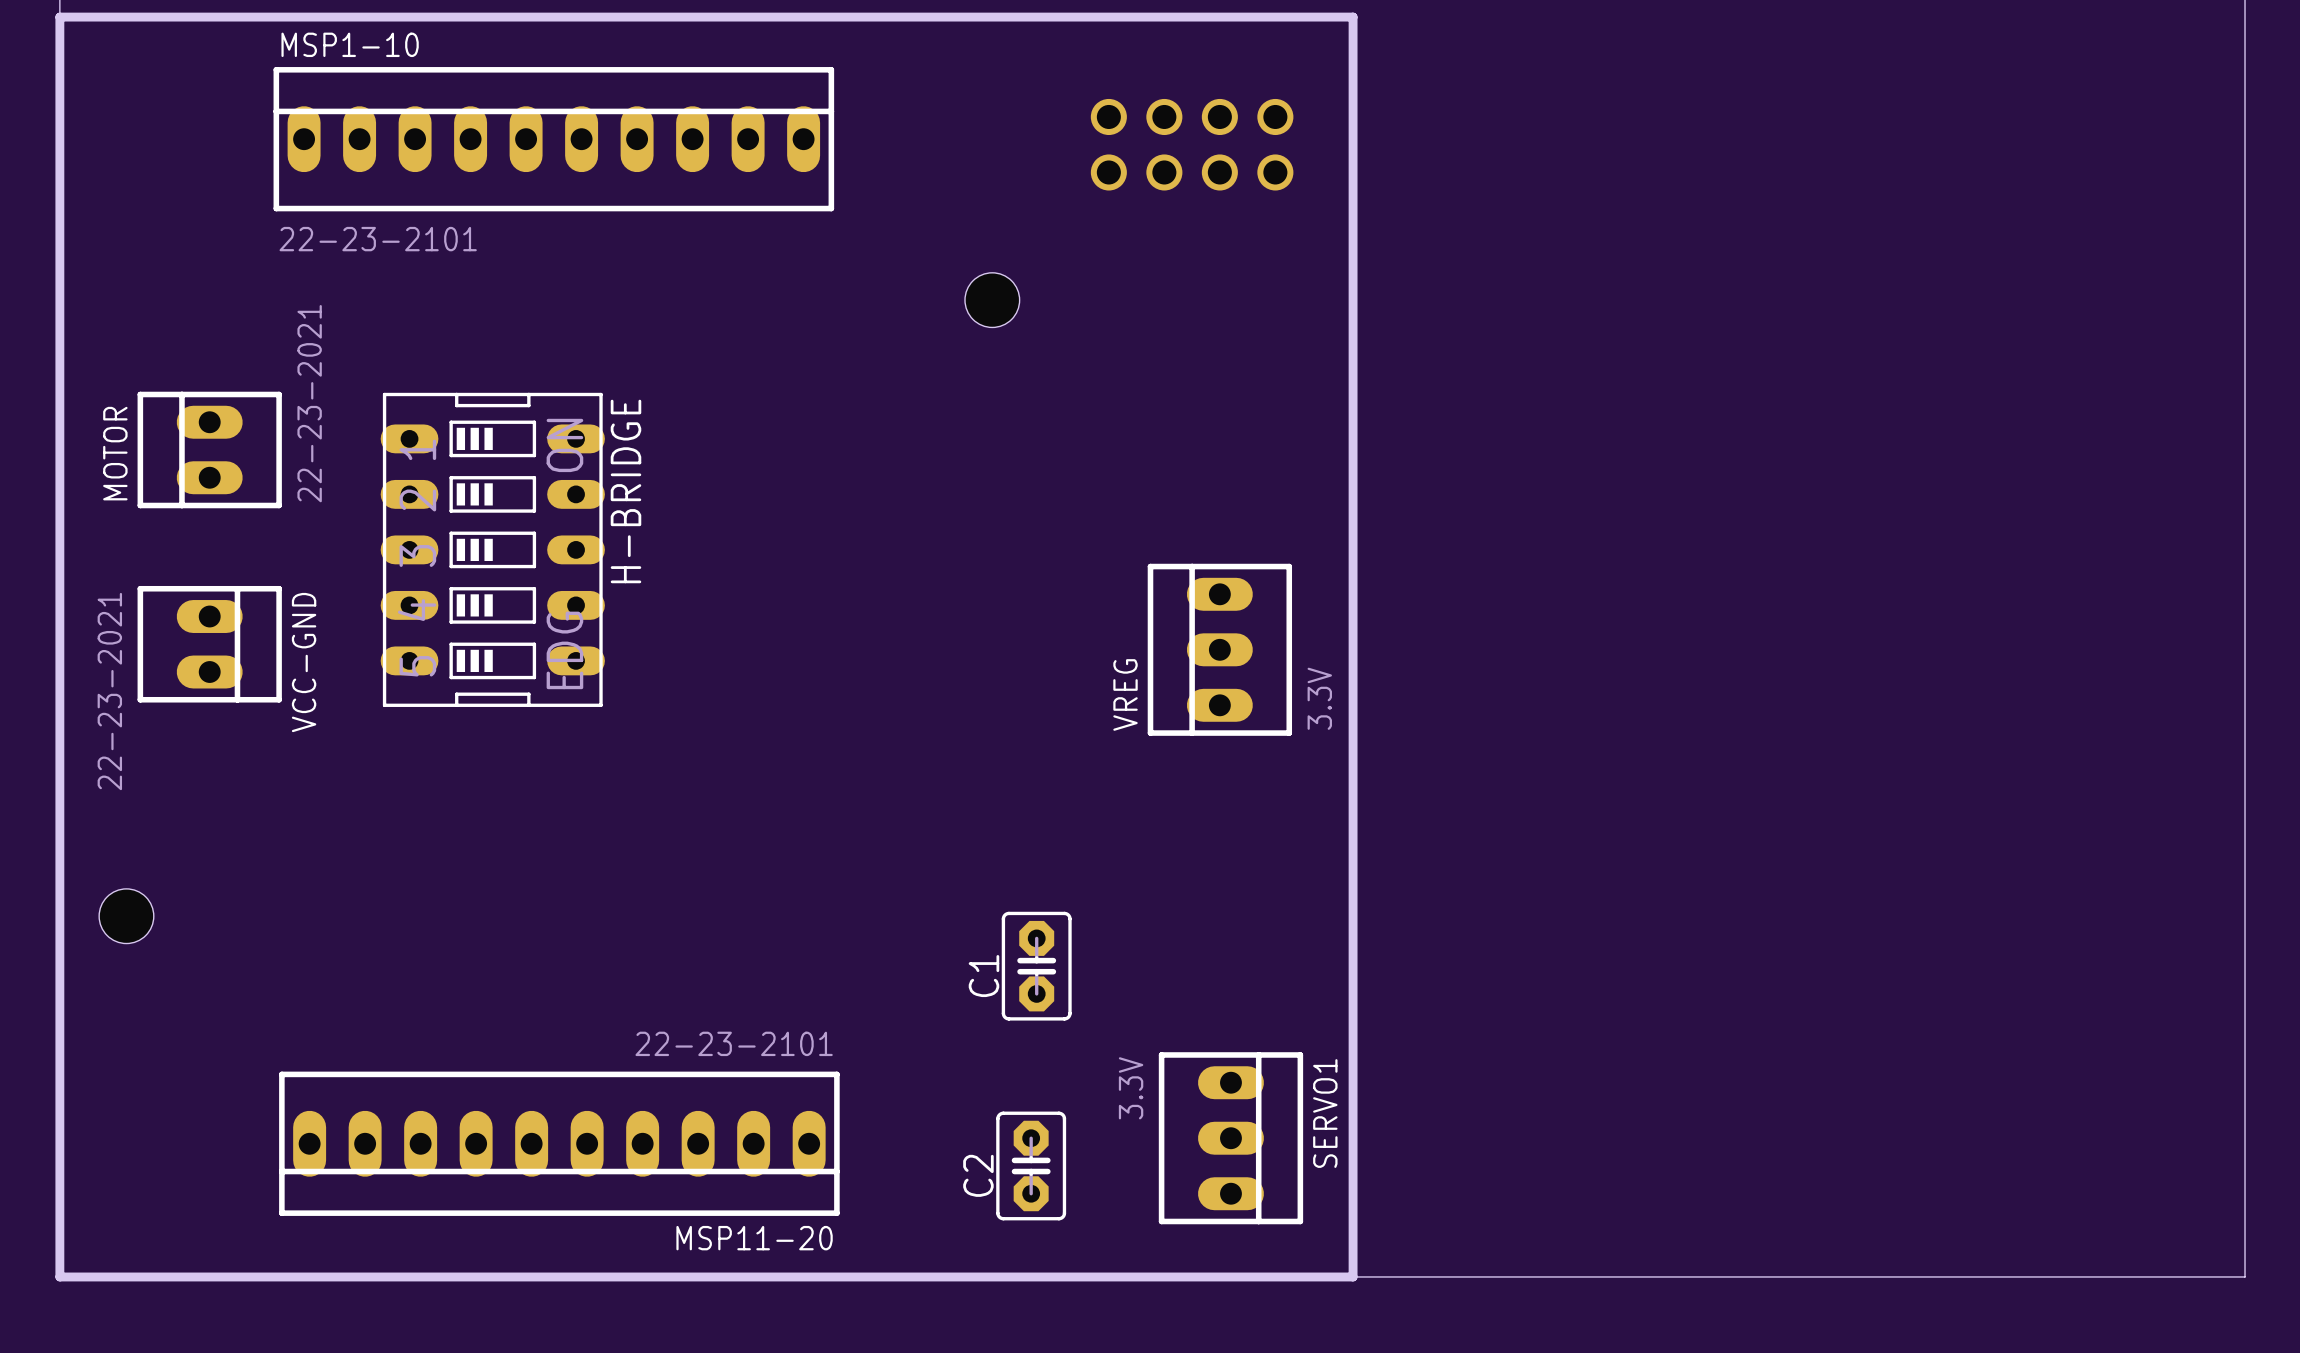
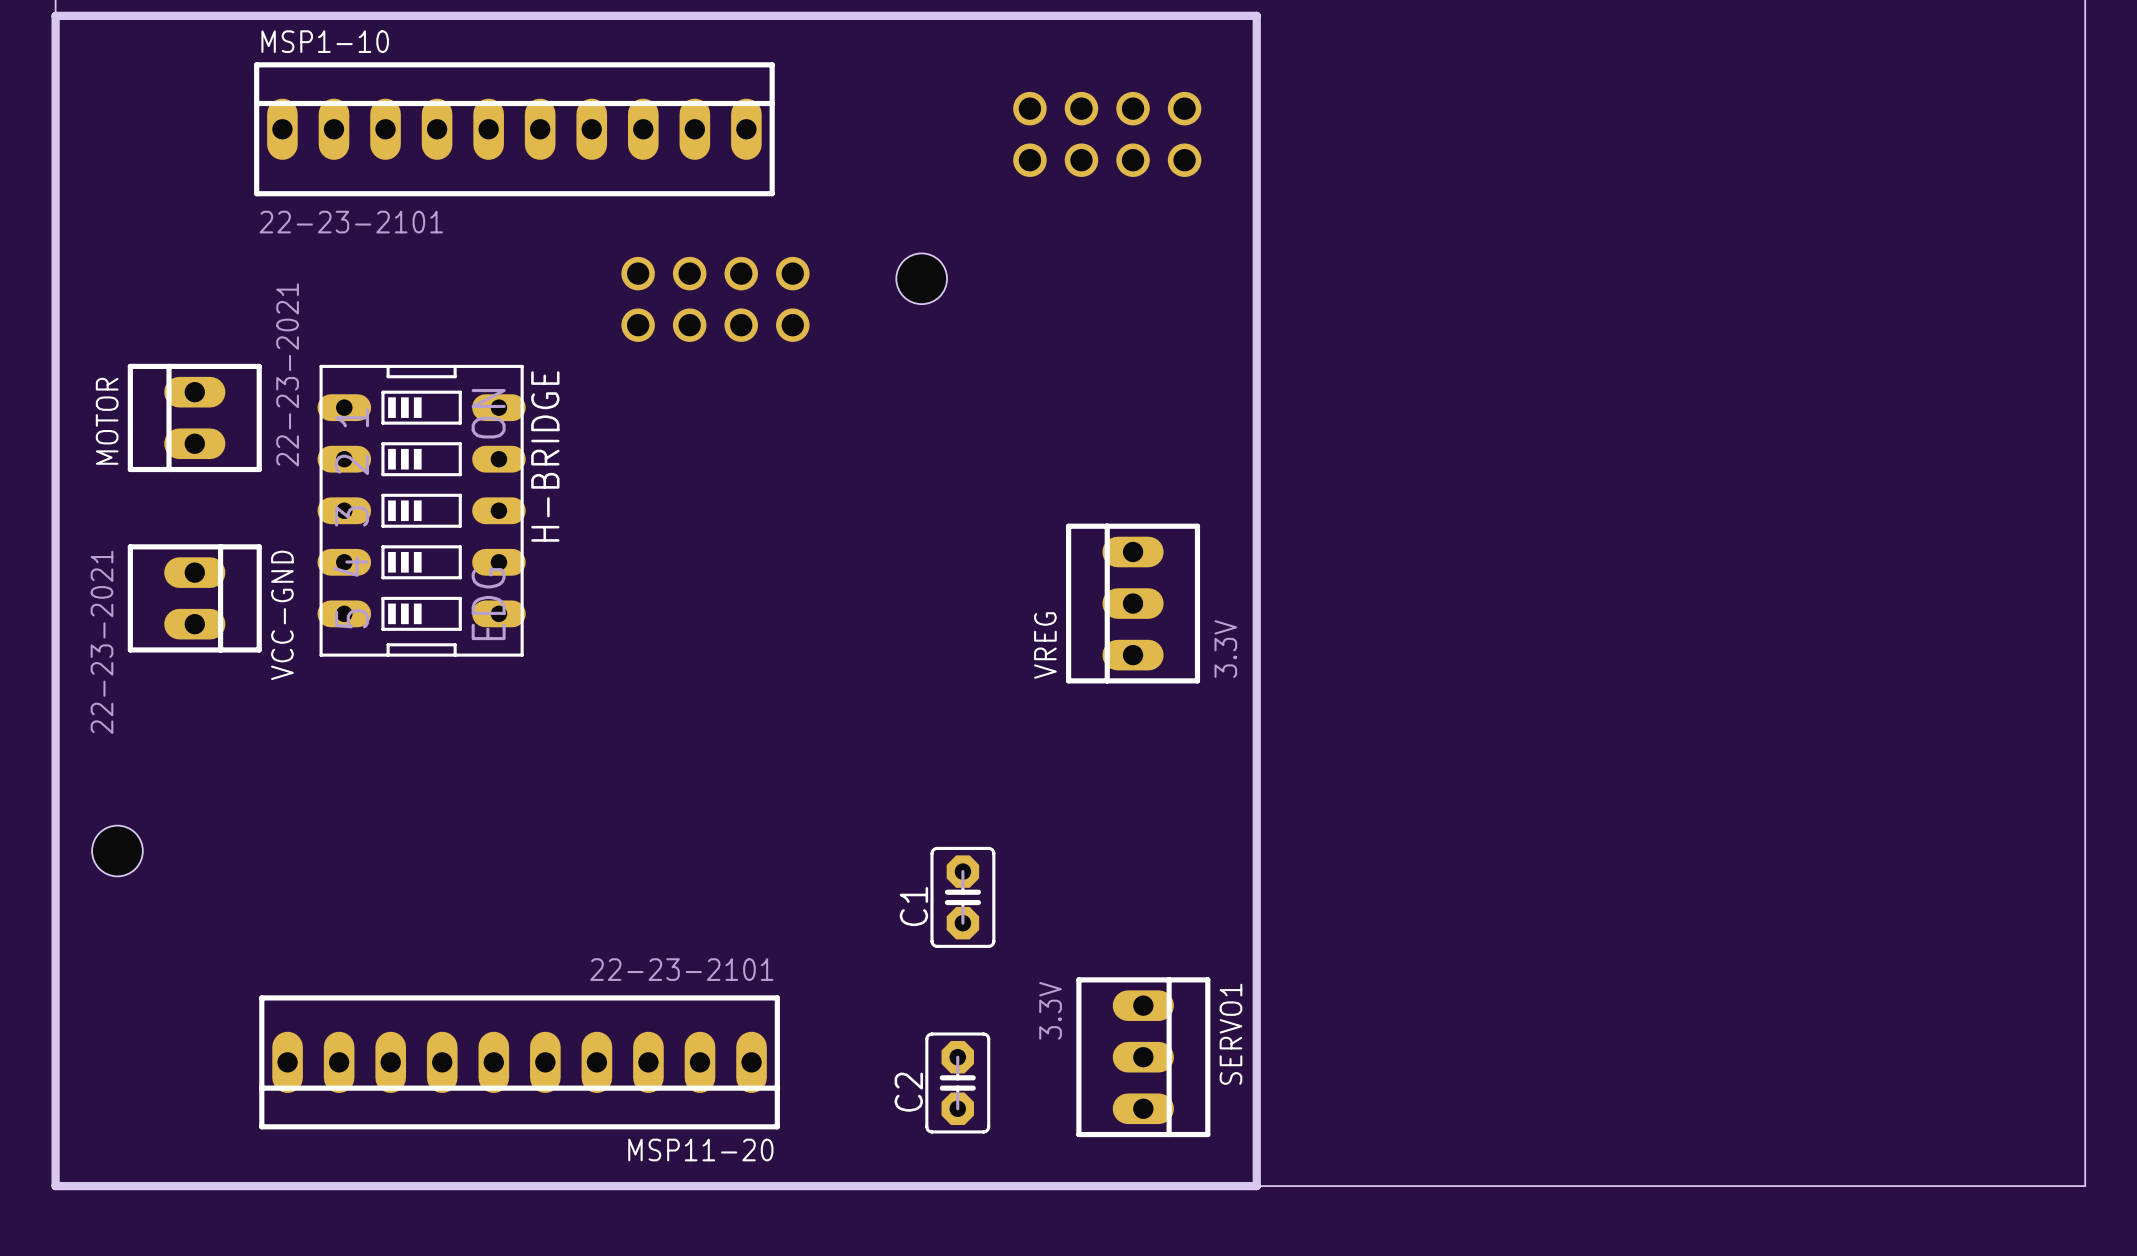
part: none -> (715, 299)
H-BRIDGE position: (492, 549) -> (421, 510)

